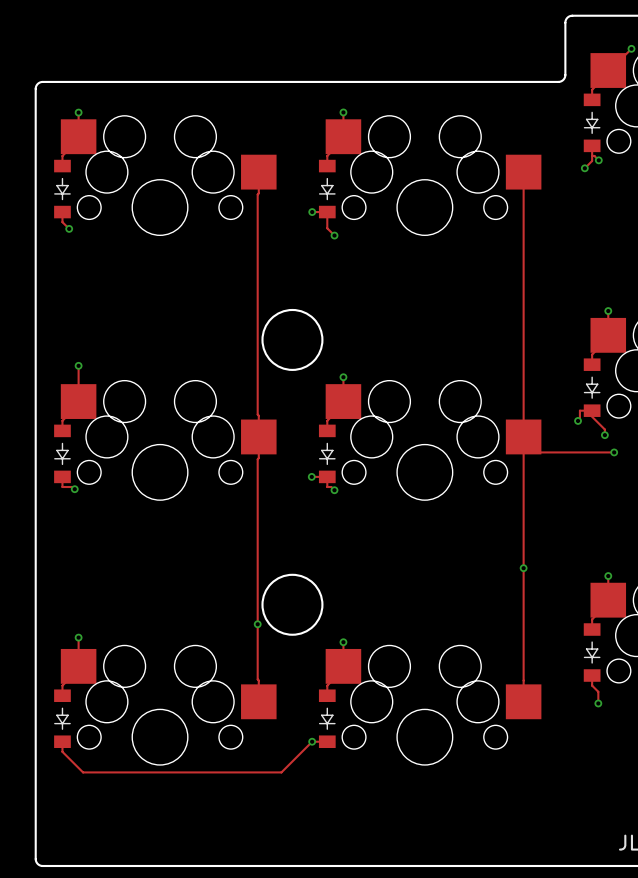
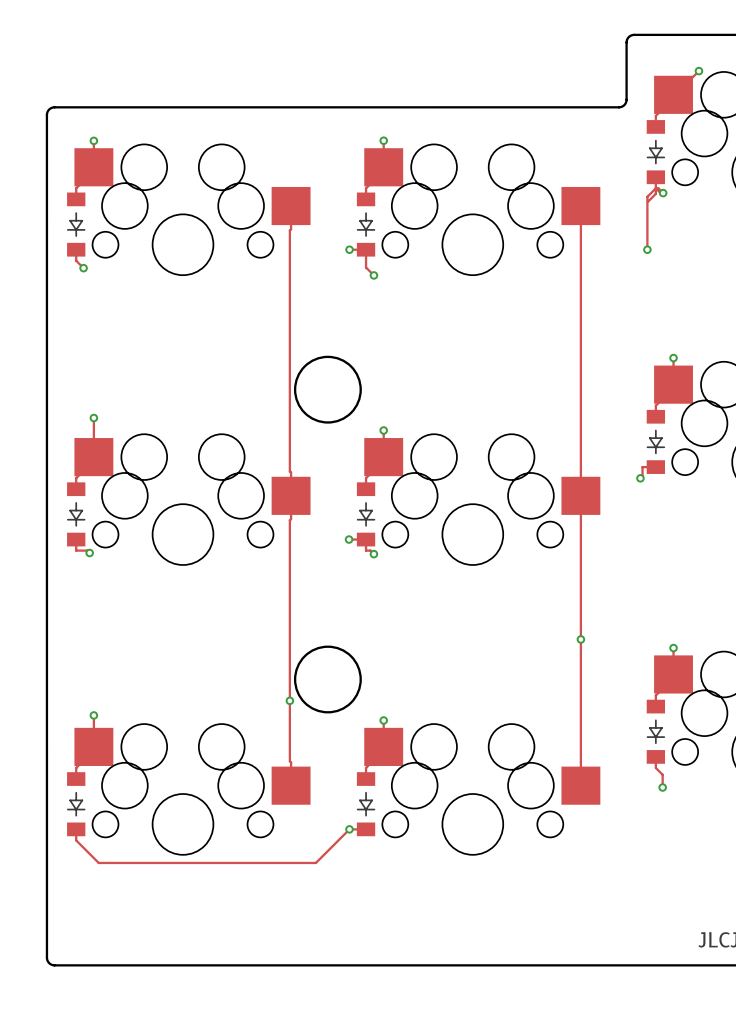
track: none -> (663, 195) (655, 188) (647, 196) (647, 249)
via position: (584, 168) -> (647, 249)
track: (586, 410) (604, 429) (604, 435) -> none
via: (604, 435) -> none
track: (523, 452) (614, 452) -> none
via: (614, 452) -> none

